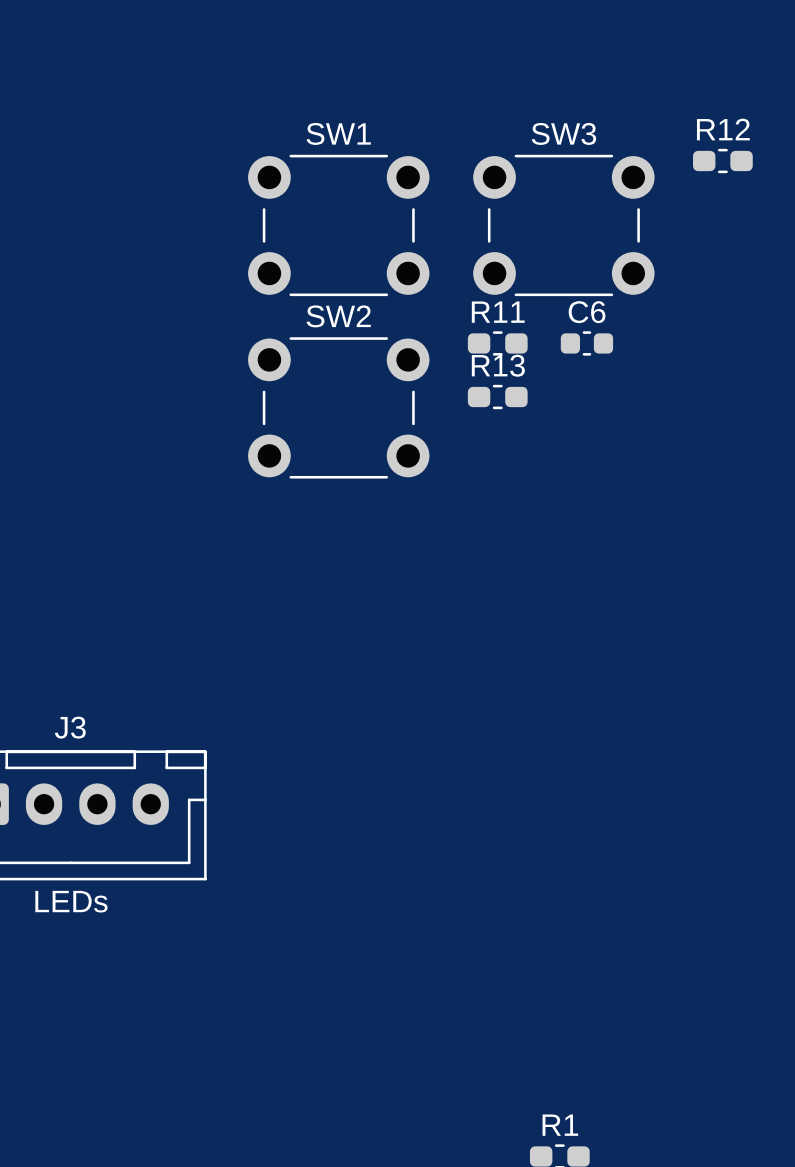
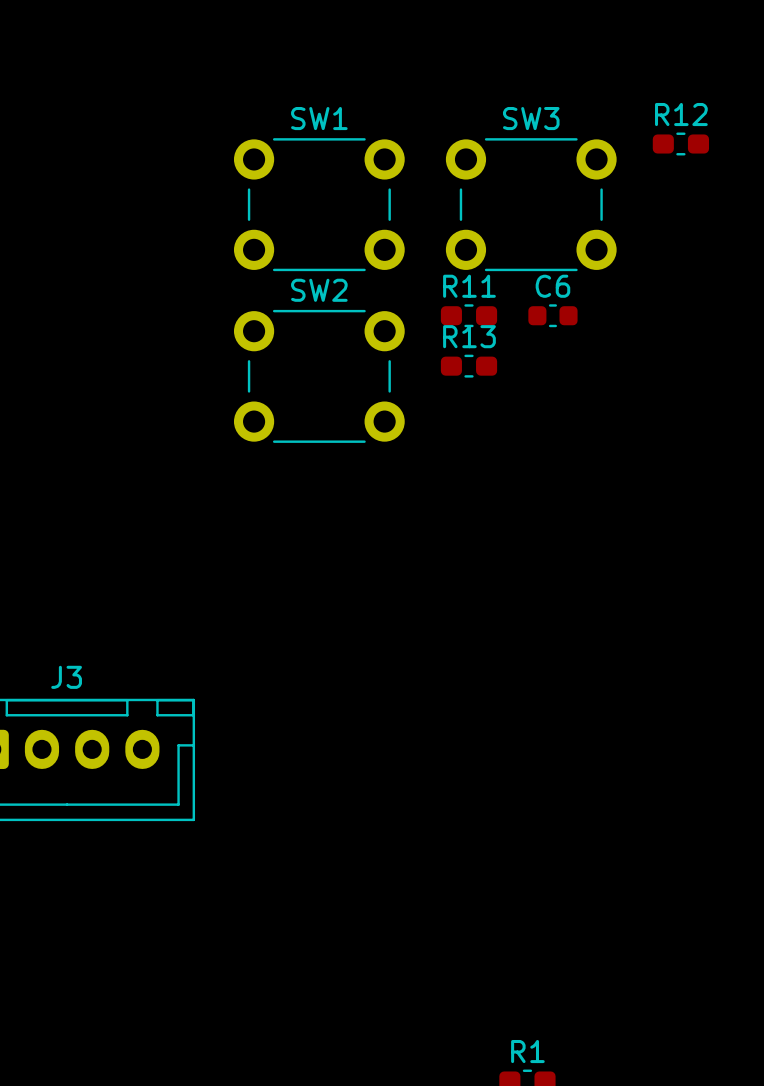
J3 value: LEDs (71, 901) -> none

